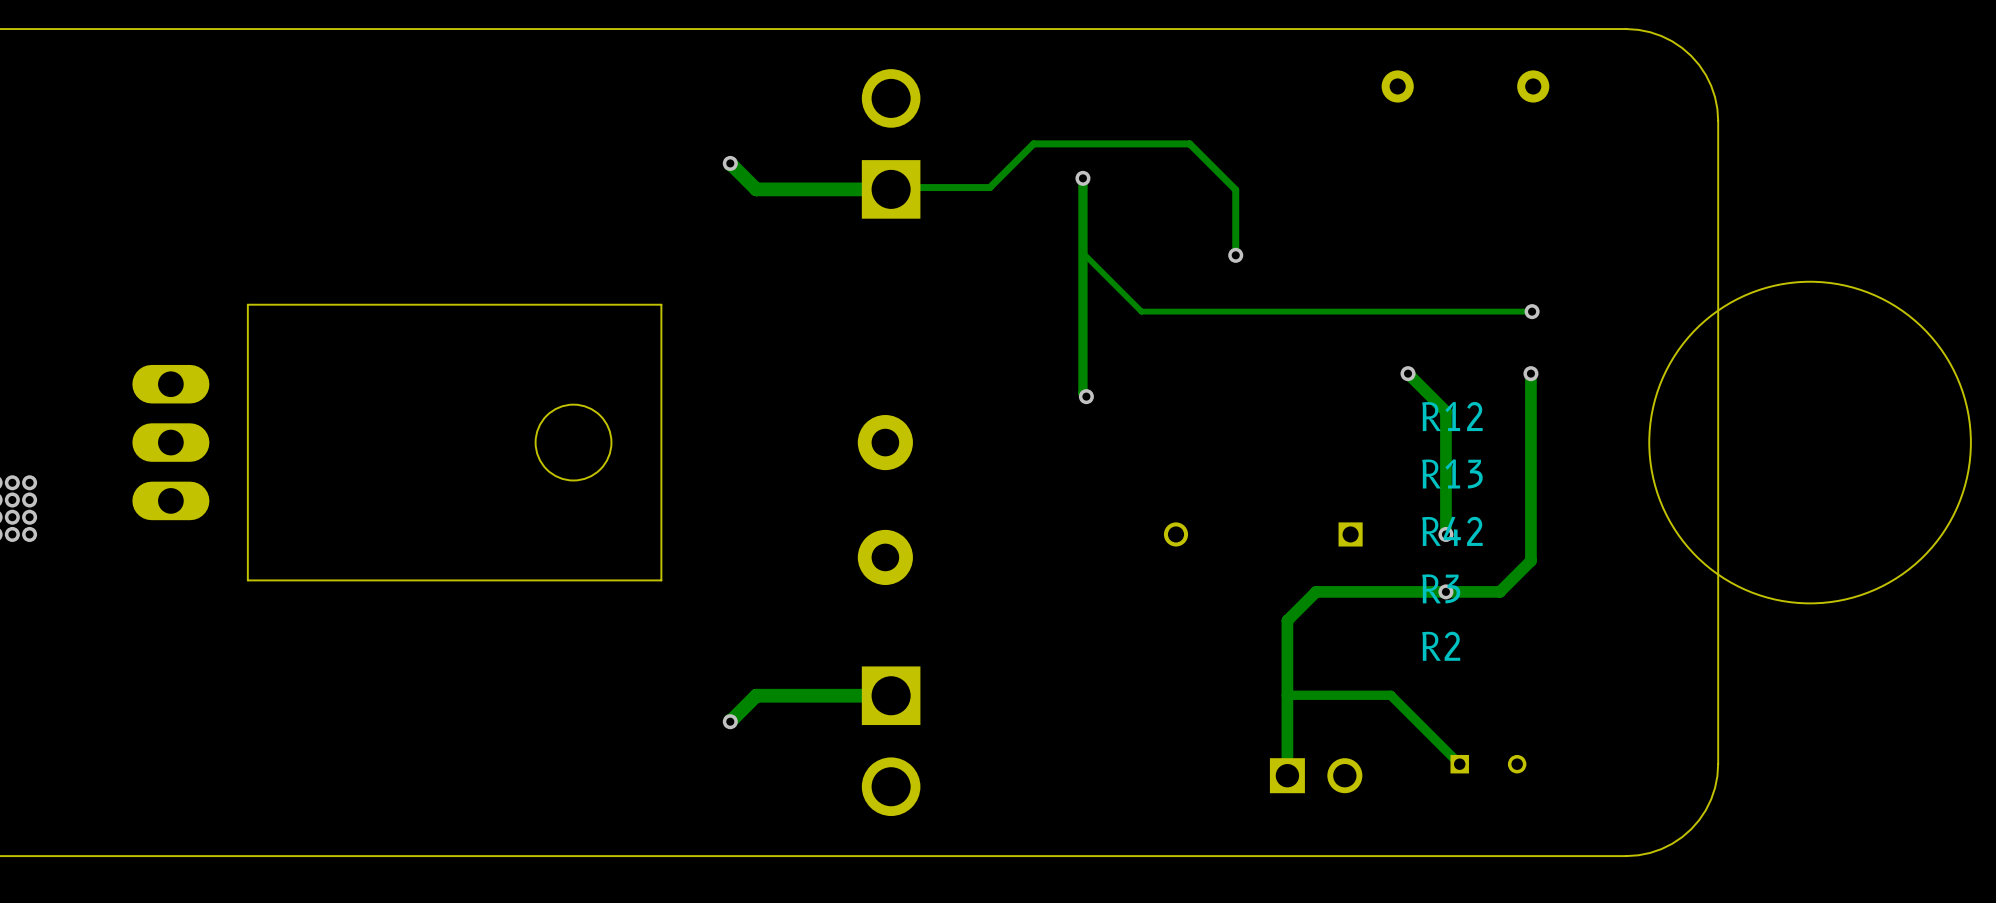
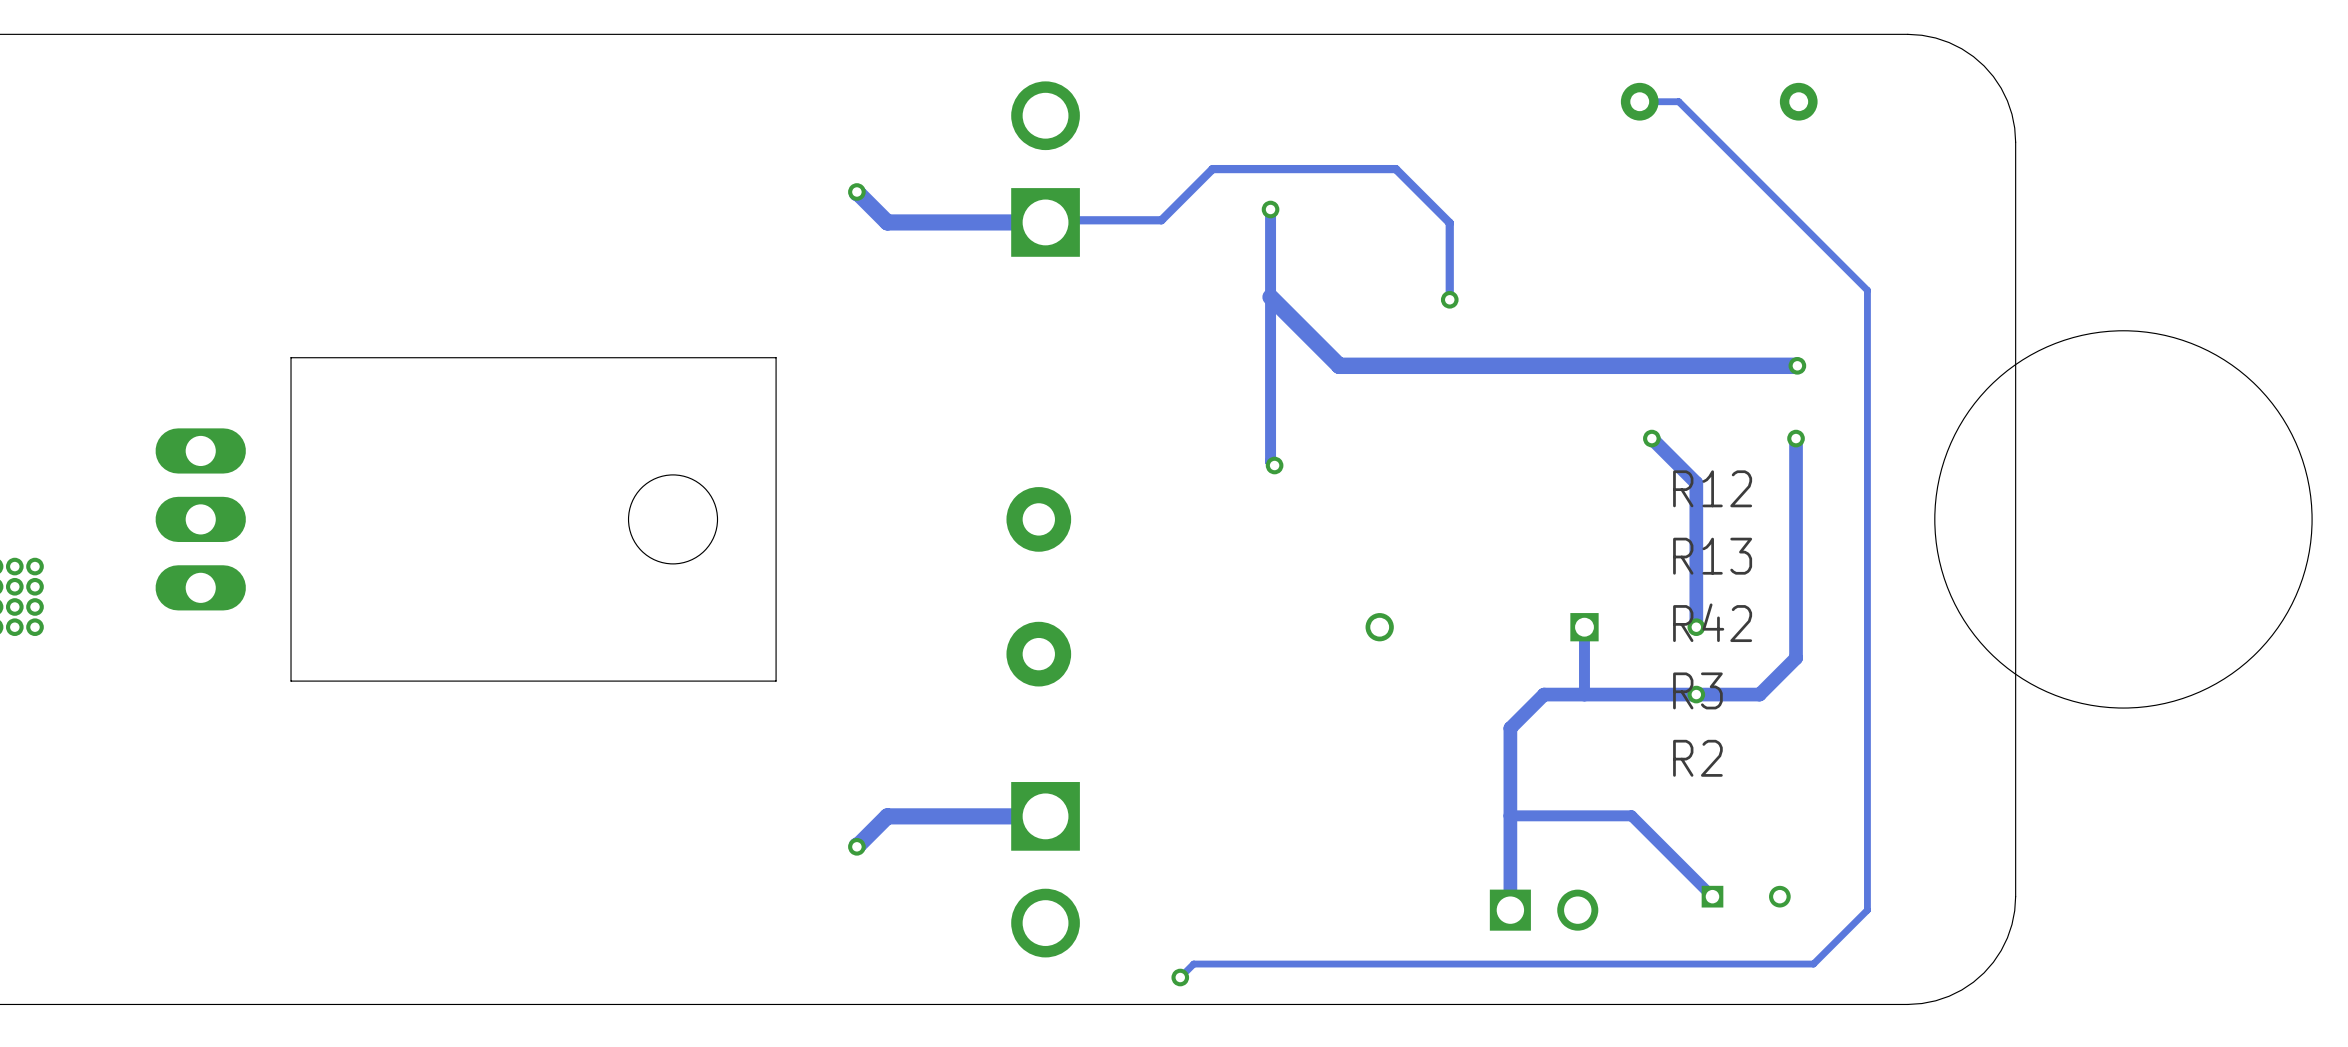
track: none -> (1639, 101) (1678, 101) (1867, 290) (1867, 910) (1813, 964) (1193, 964) (1180, 977)
track width: thin (1082, 253) (1141, 311) (1532, 311) -> thick (1270, 297) (1339, 365) (1797, 365)
track: none -> (1584, 627) (1584, 694)
via: none -> (1180, 977)

